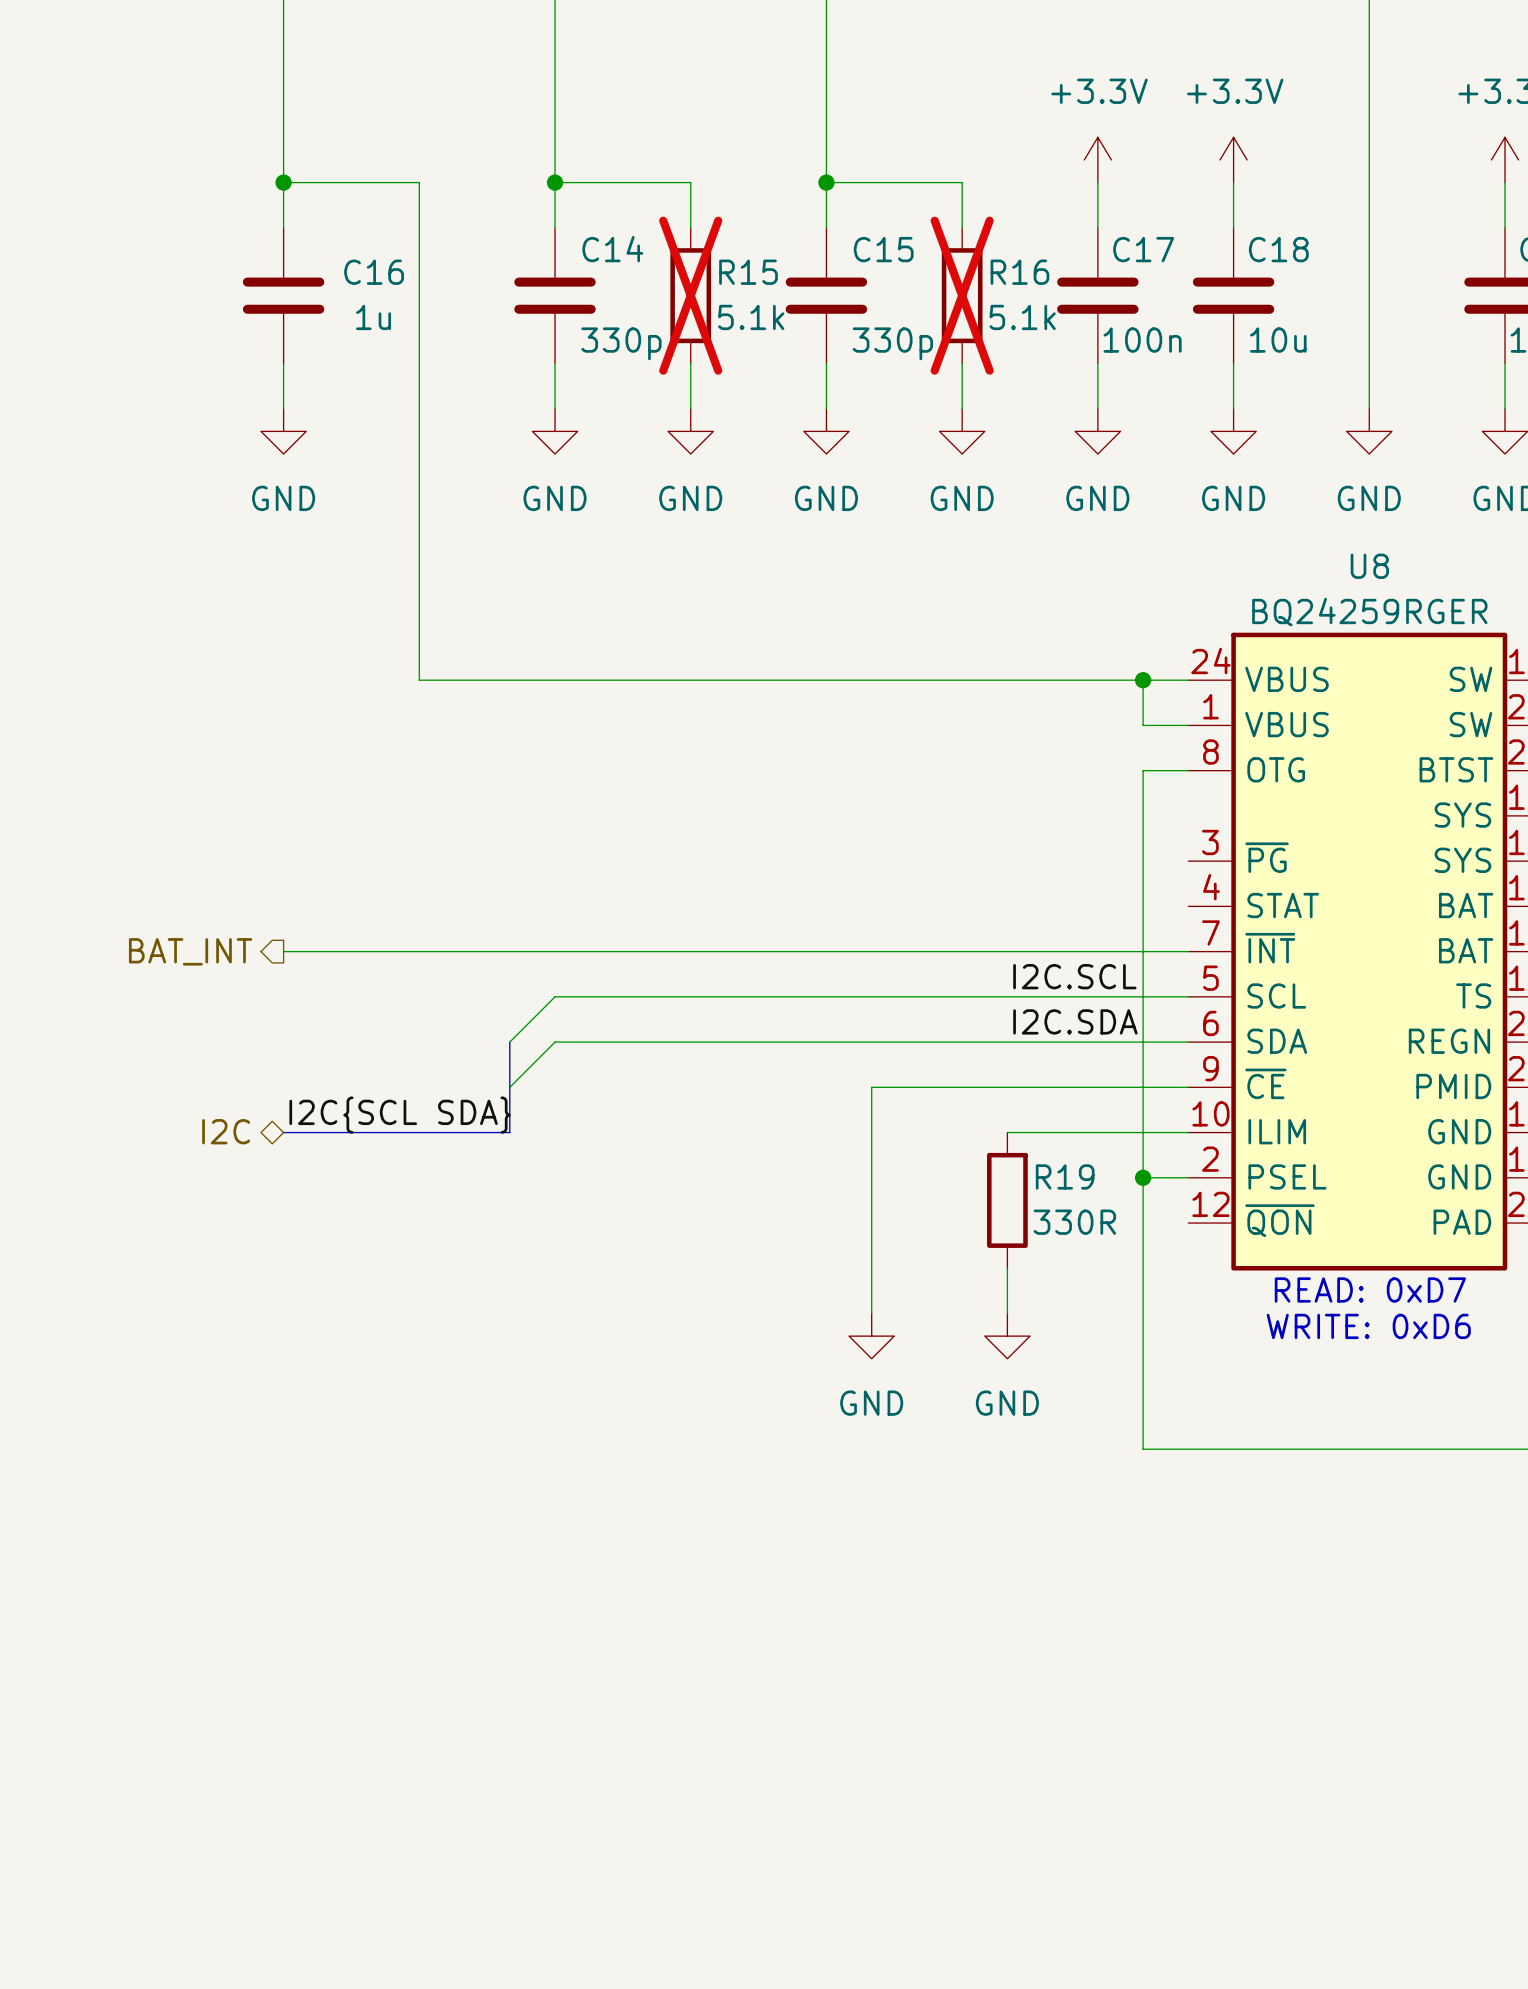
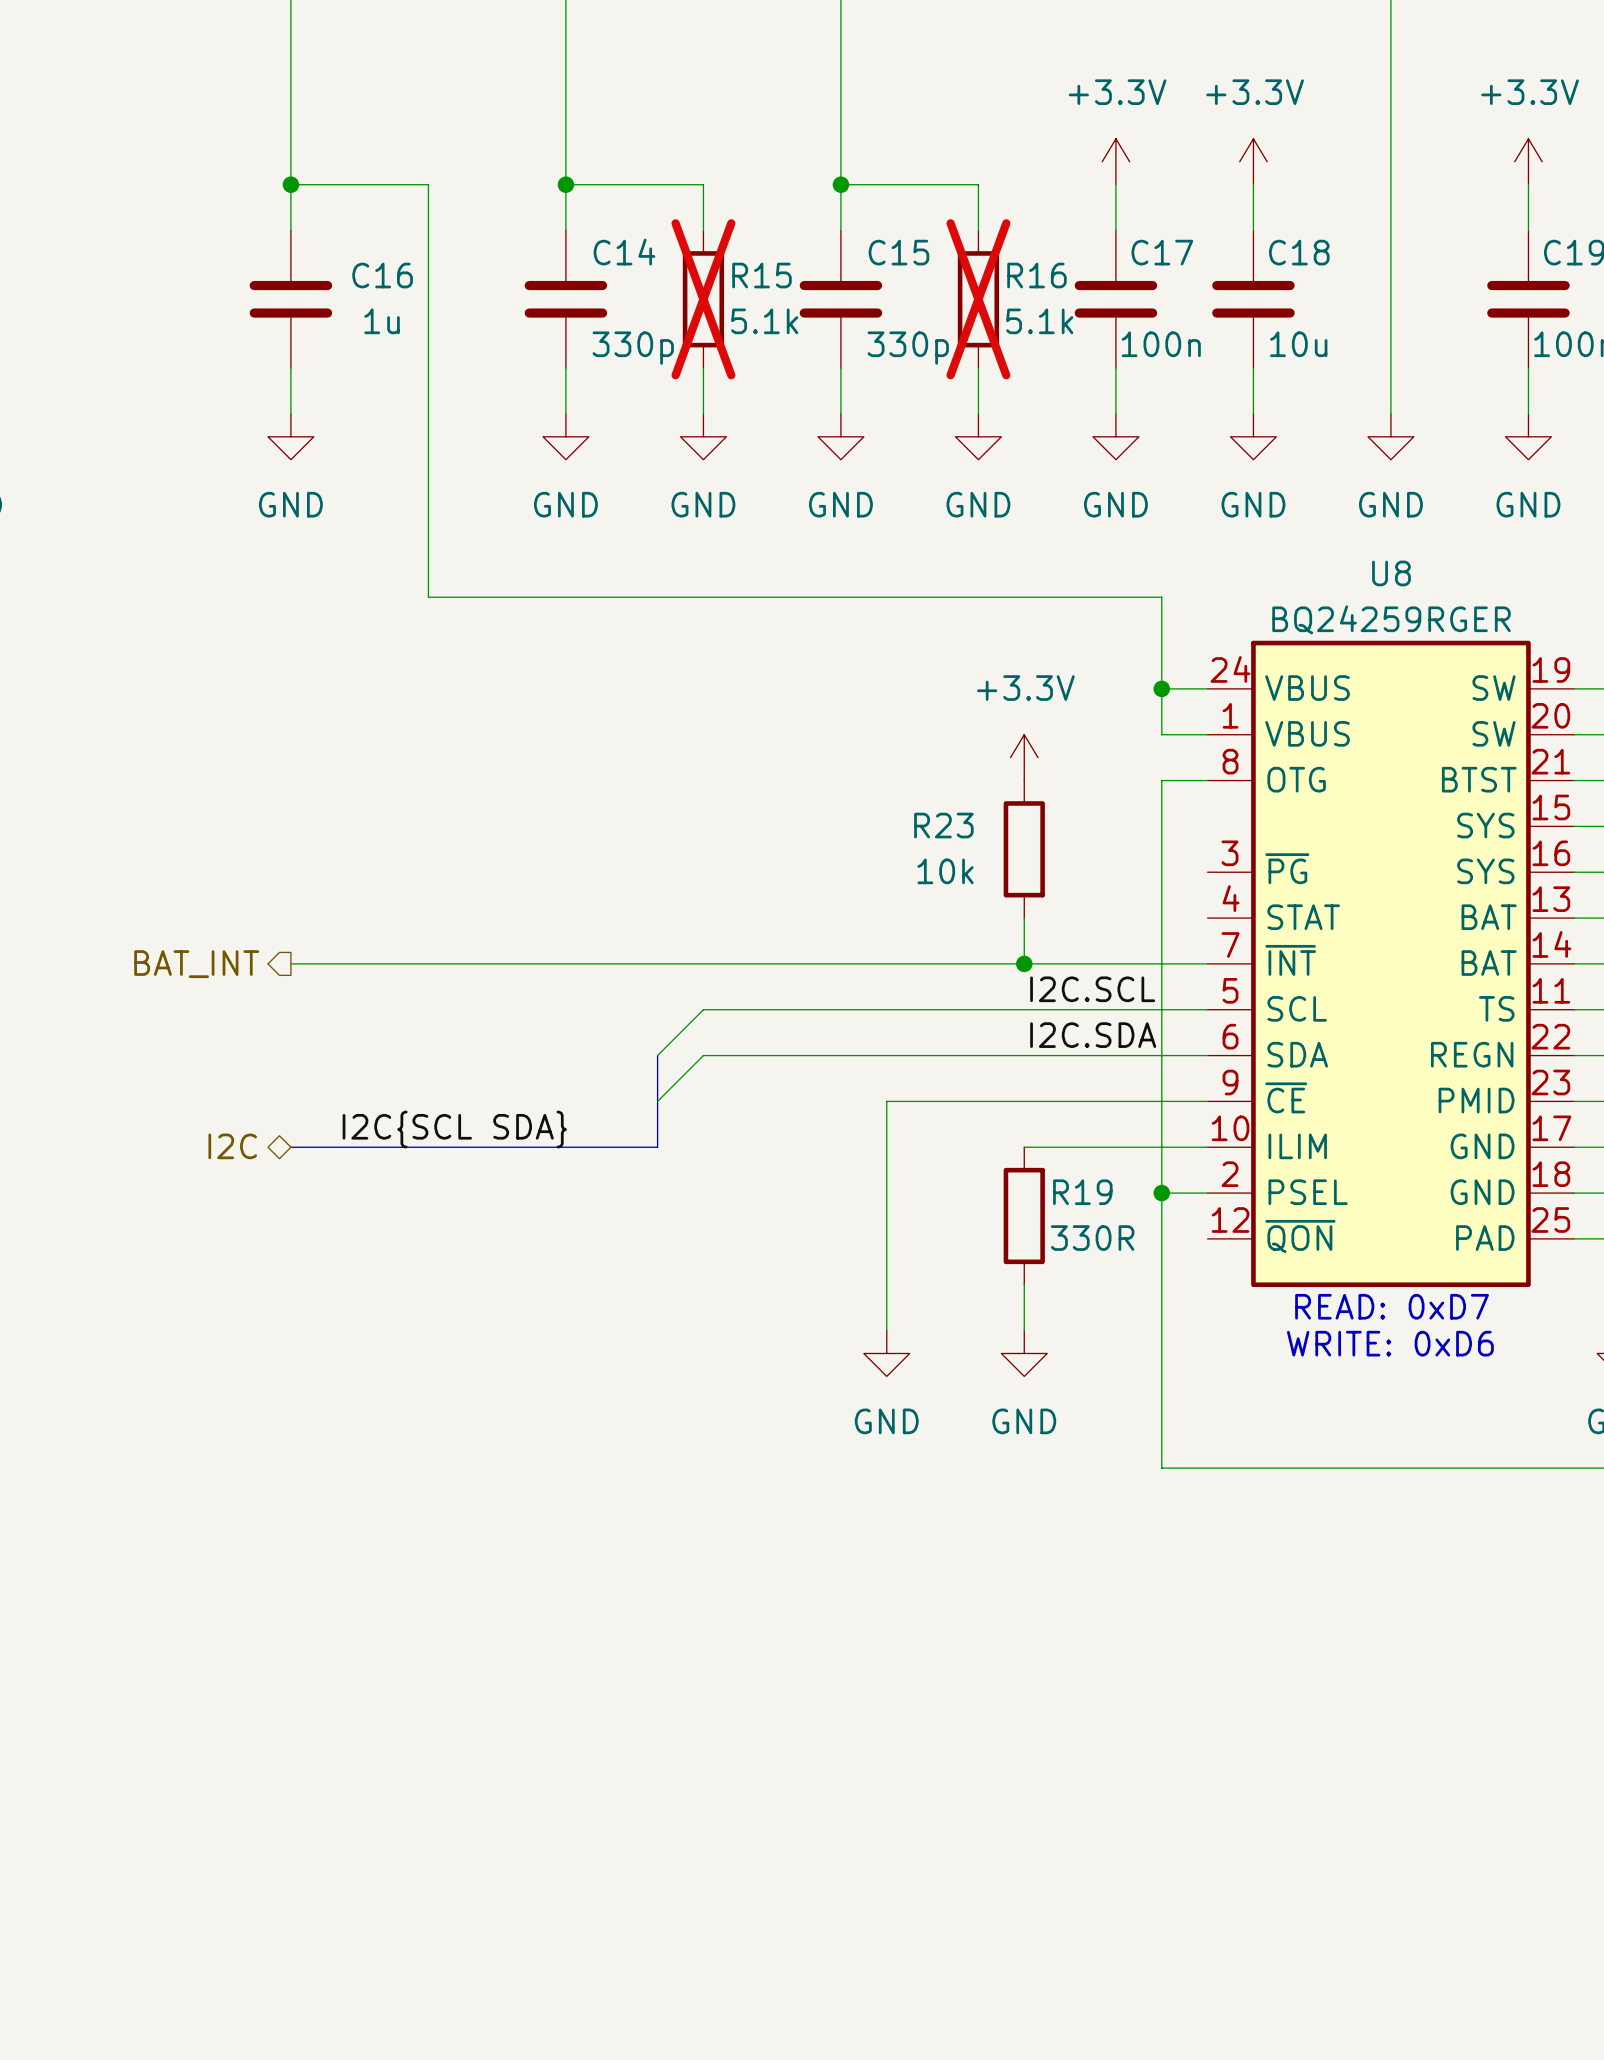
wire: (419, 589) (419, 680) (1143, 680) -> (428, 597) (1161, 597) (1161, 688)
power symbol: none -> +3.3V (1024, 757)
R23: none -> 10k (1024, 849)
wire: none -> (1024, 918) (1024, 963)
junction: none -> (1024, 963)
wire: (690, 996) (555, 996) (509, 1042) -> (703, 1009) (657, 1055)
bus: (509, 1042) (509, 1132) -> (657, 1055) (657, 1147) (520, 1147)
wire: (690, 1042) (555, 1042) (509, 1087) -> (703, 1055) (657, 1101)
label position: I2C{SCL SDA} (400, 1115) -> I2C{SCL SDA} (454, 1129)

